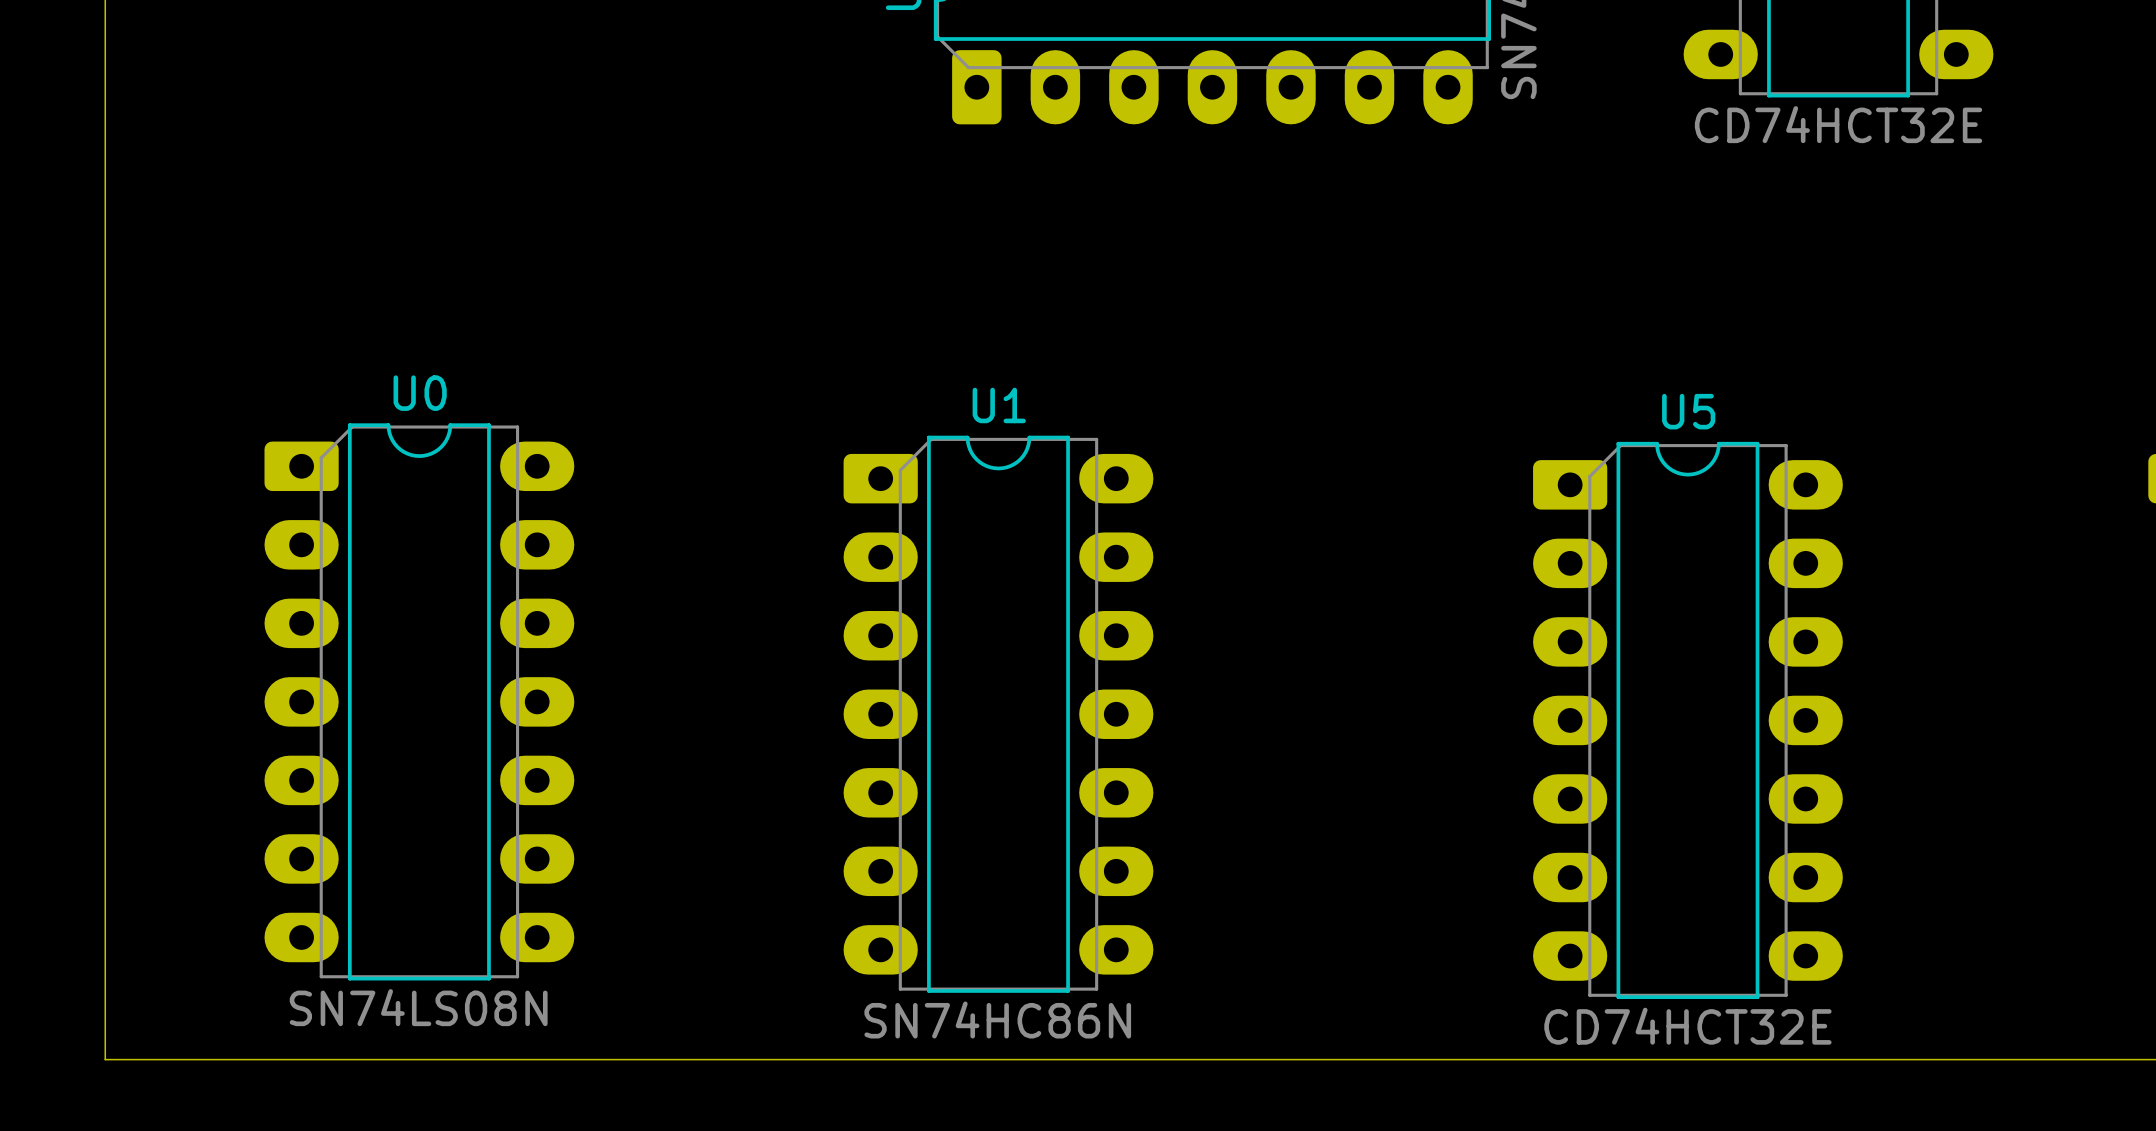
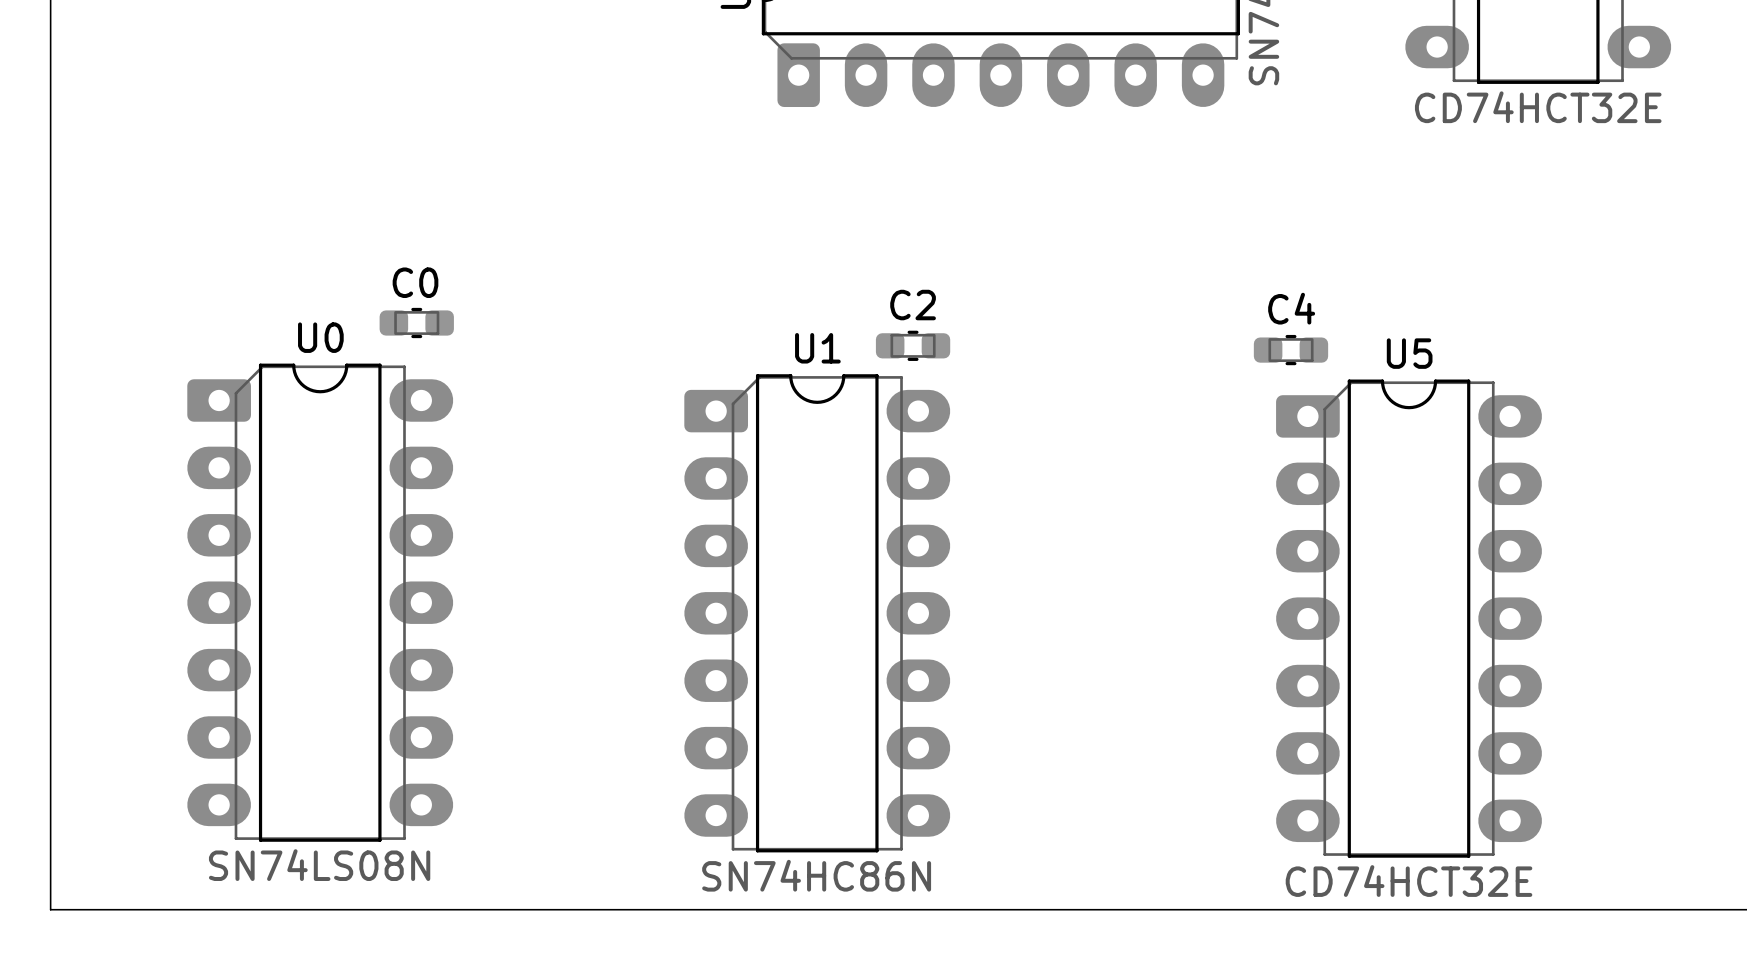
C0: none -> (416, 323)
C2: none -> (913, 345)
C4: none -> (1290, 350)

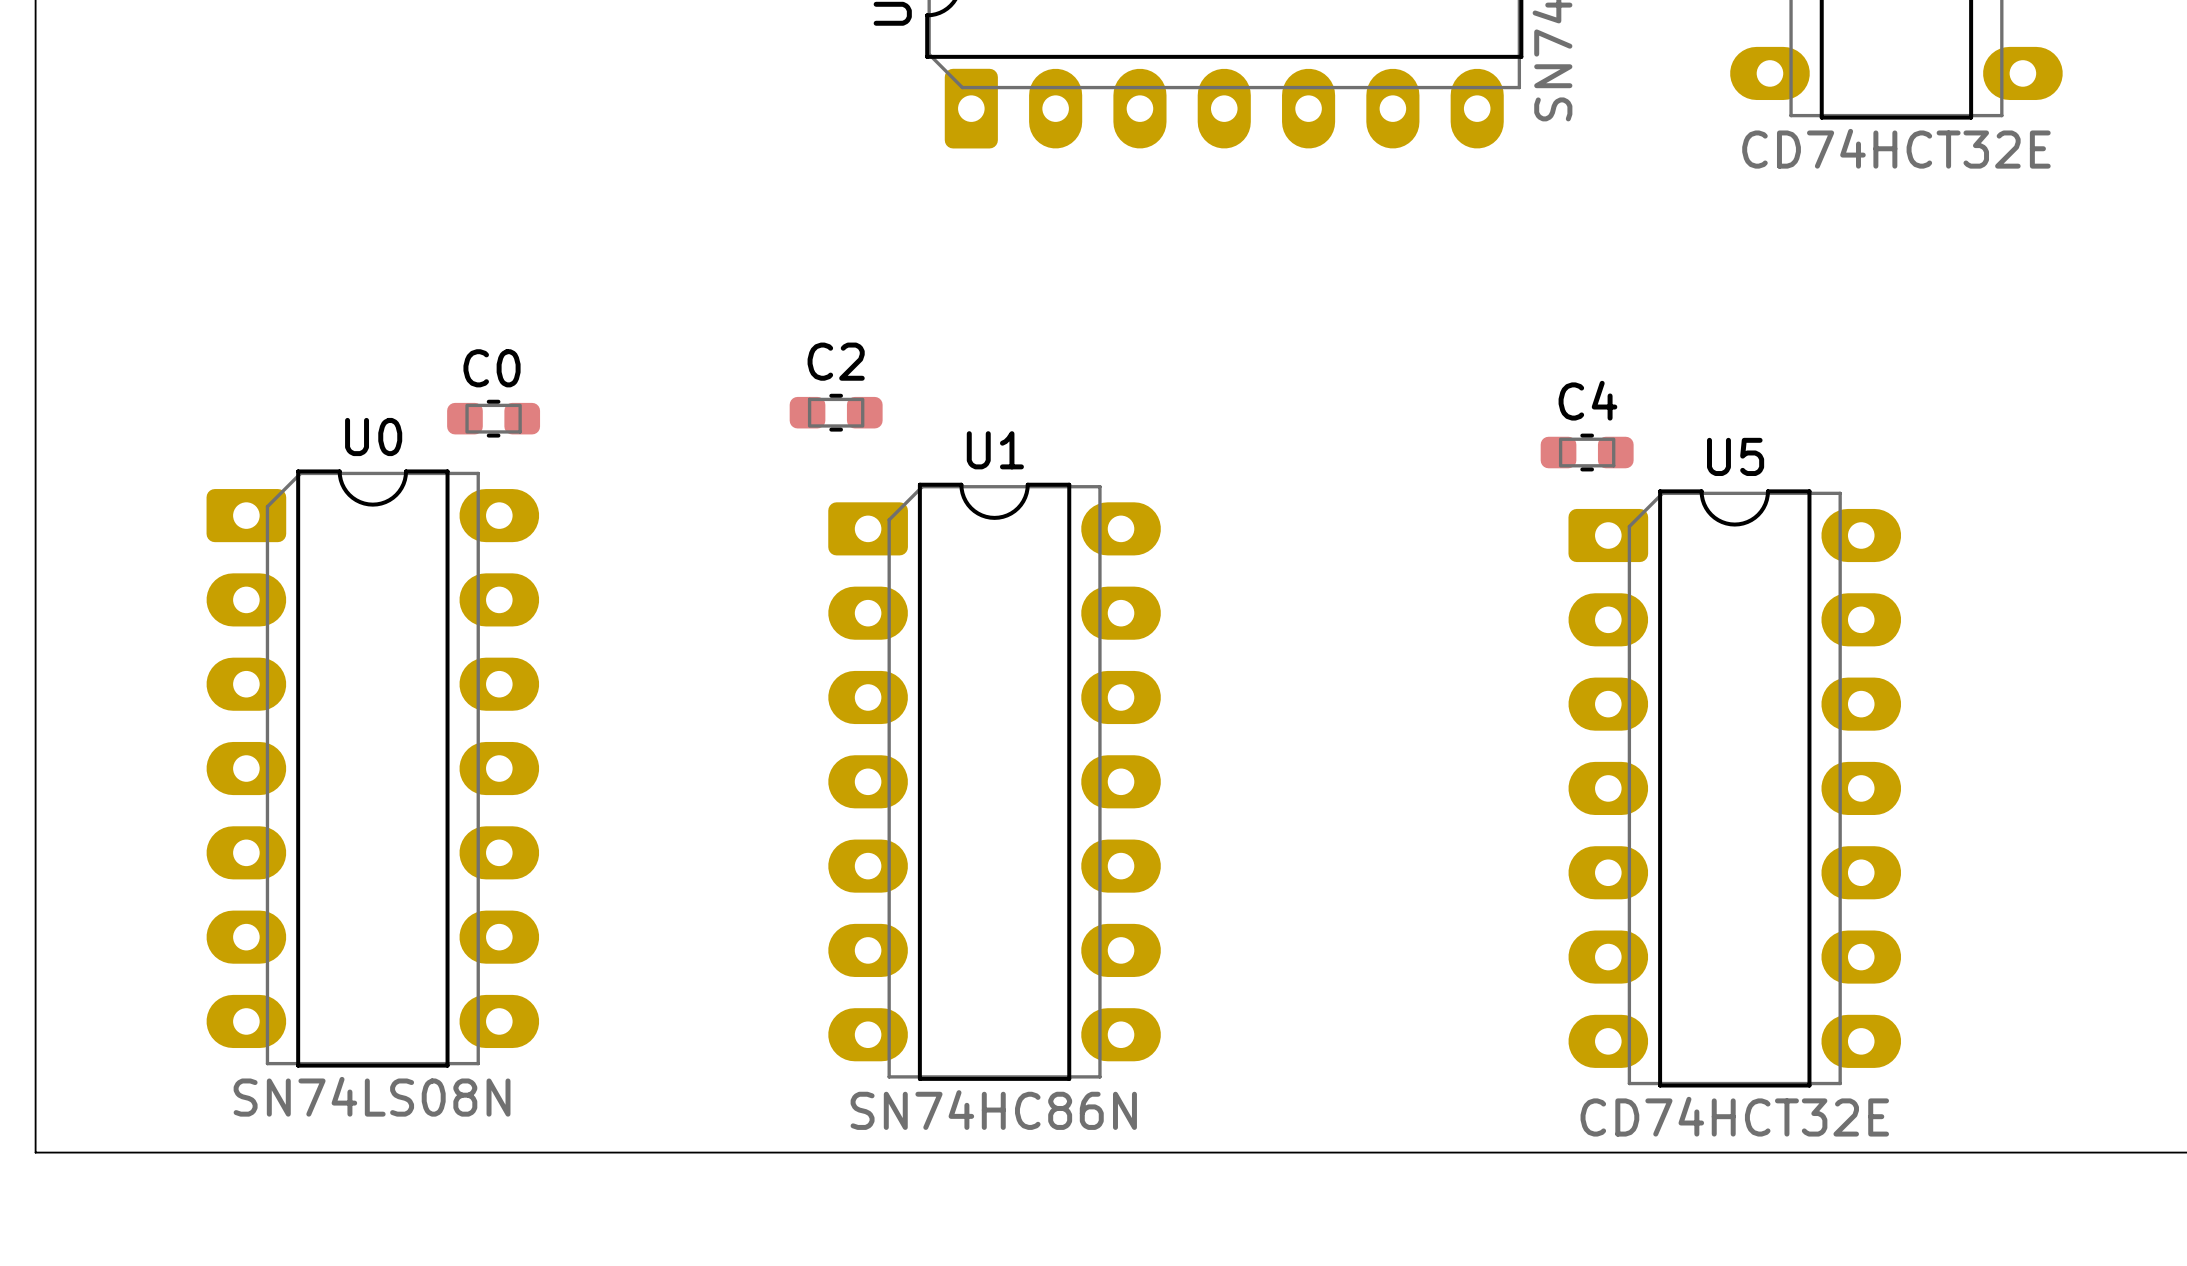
C2 position: (913, 345) -> (836, 412)

